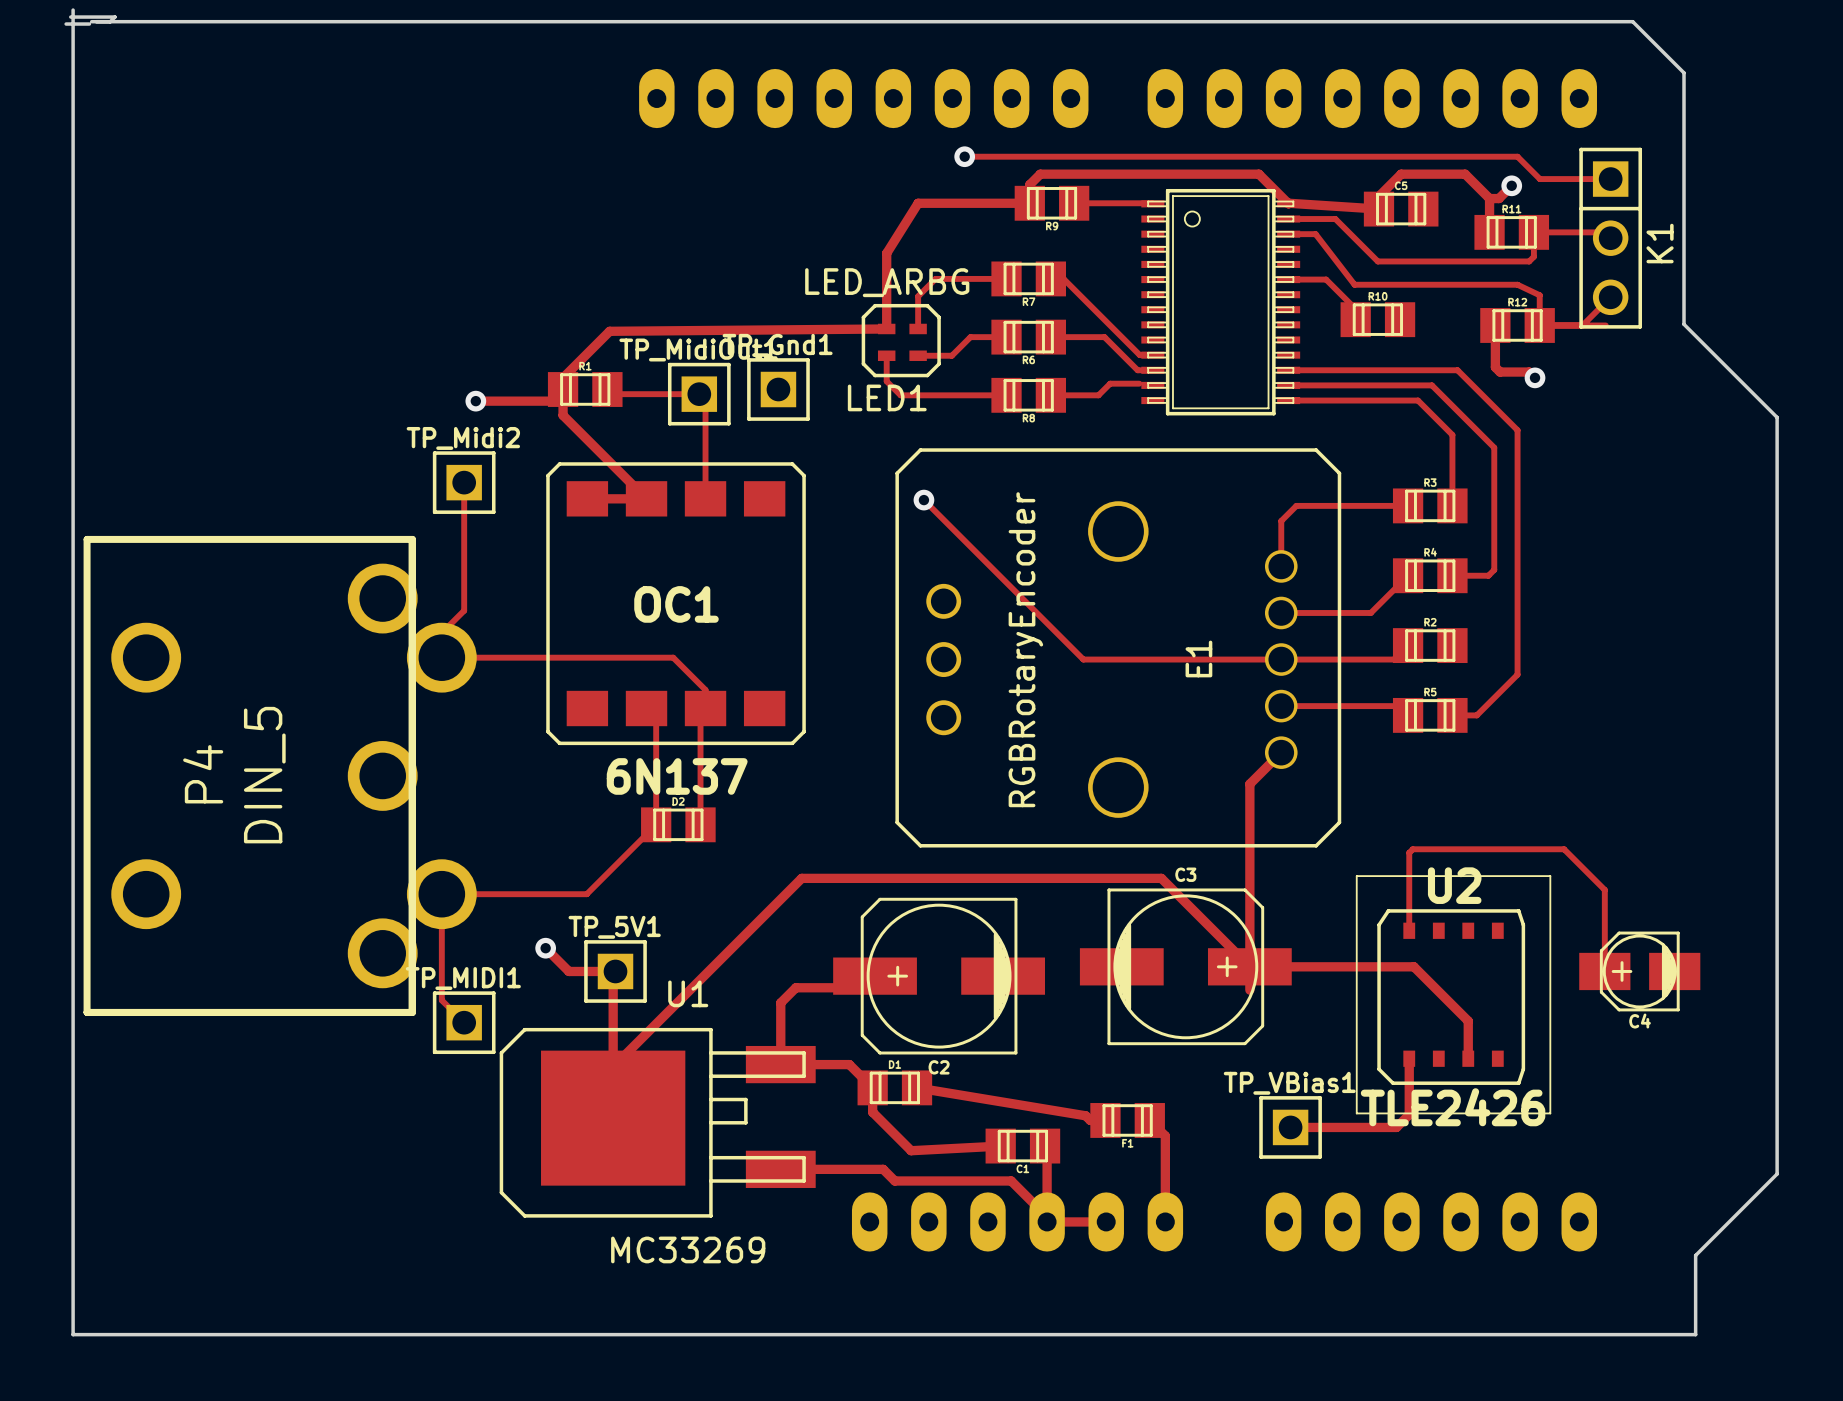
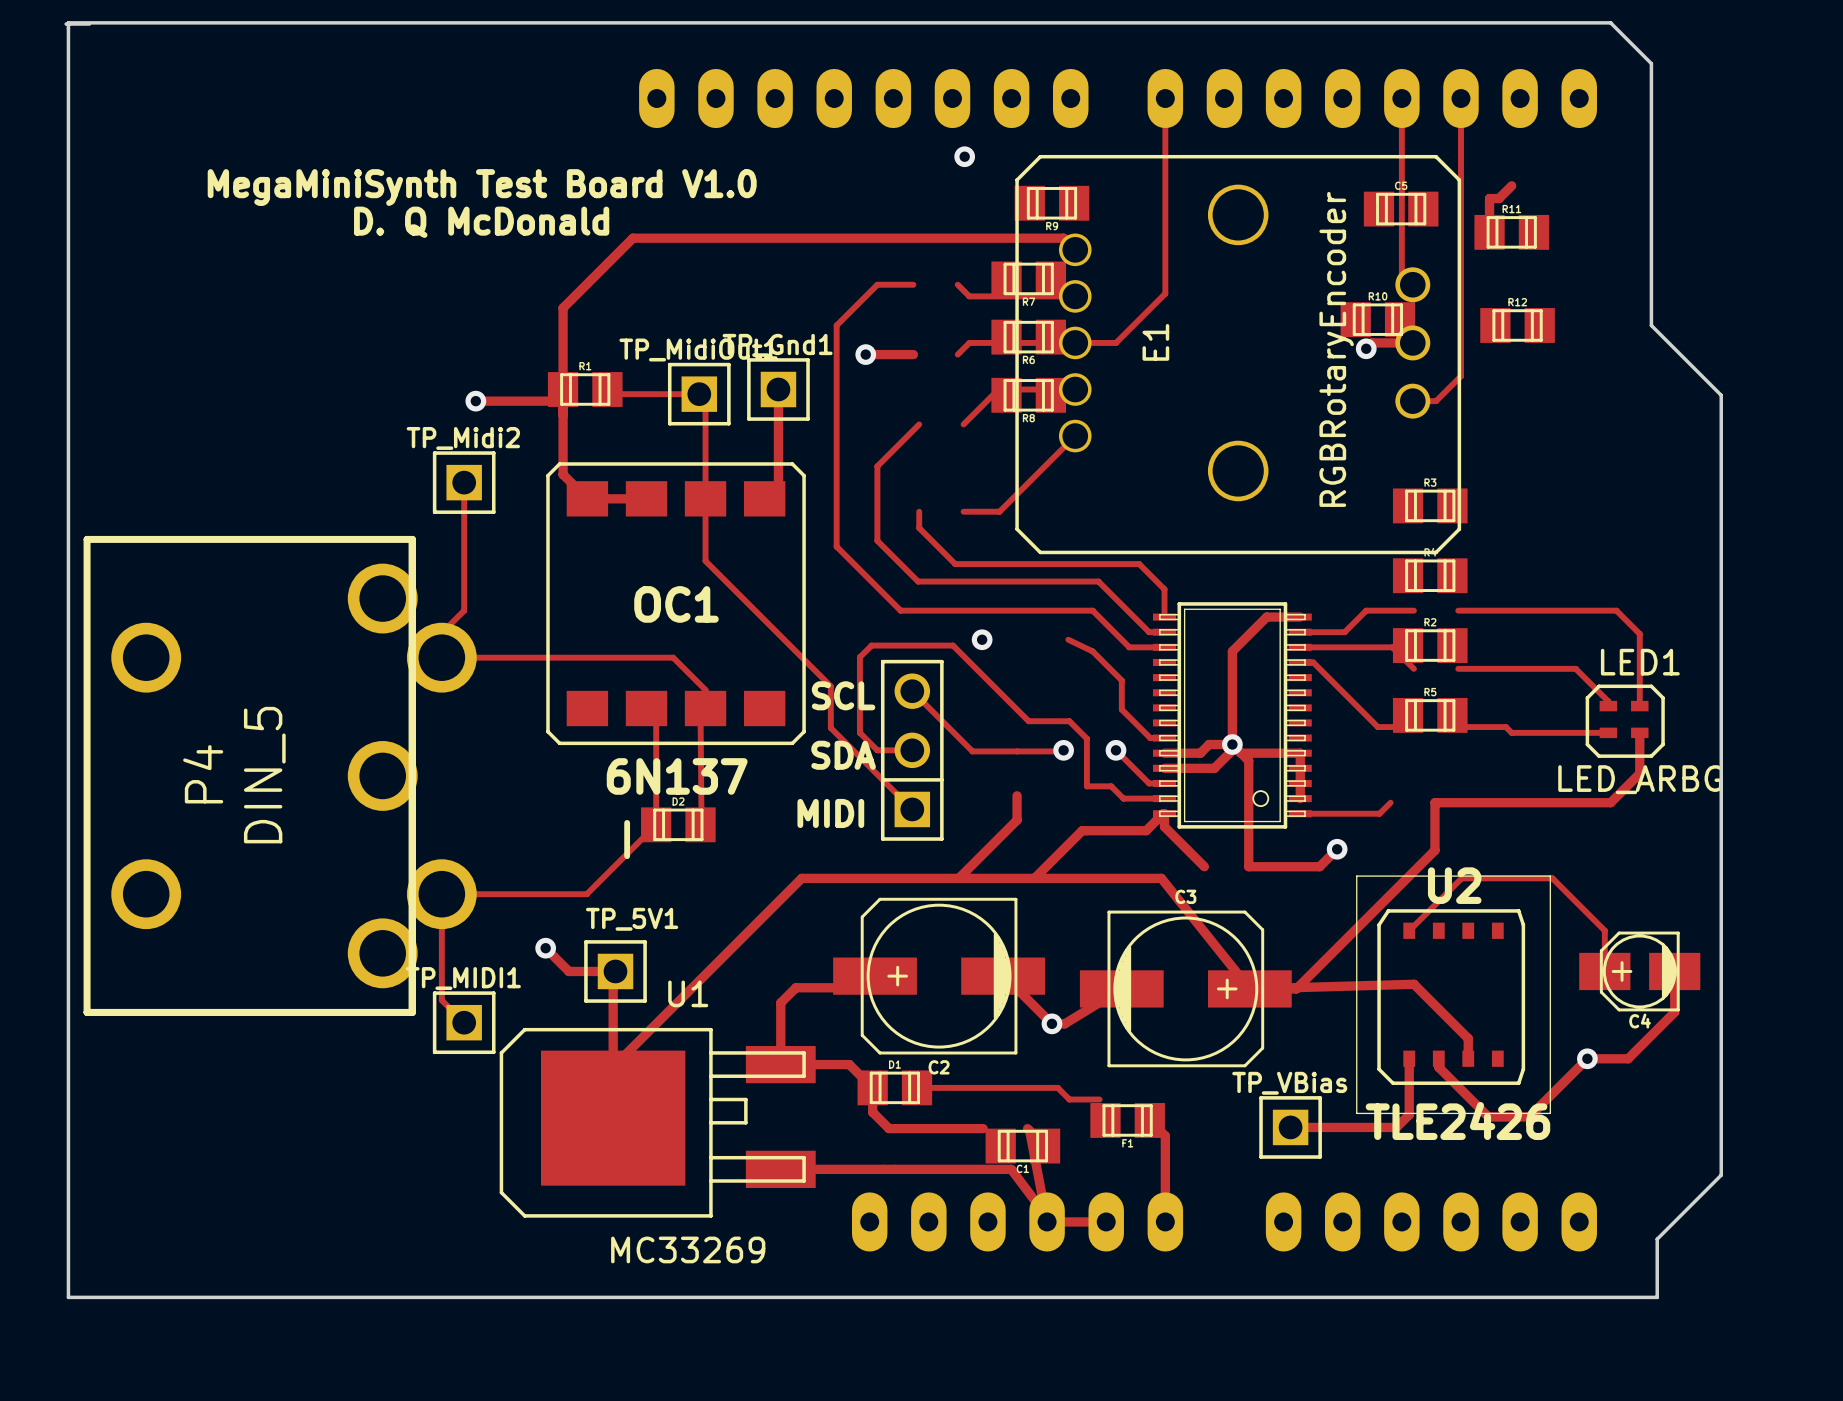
board edge: (73, 10) (73, 1334) (1695, 1334) (1695, 1255) (1777, 1174) (1777, 417) (1684, 324) (1684, 72) (1632, 21) (91, 21) -> none
board edge: (70, 17) (115, 17) (110, 21) -> none
board edge: none -> (68, 22) (68, 1297) (1657, 1297) (1657, 1239) (1721, 1175) (1721, 395) (1651, 325) (1651, 63) (1610, 22) (68, 22)
track: none -> (1165, 98) (1165, 293) (1115, 342) (969, 342) (957, 354)
track: none -> (1460, 98) (1460, 376) (1436, 401) (1412, 401)
track: (964, 156) (1517, 156) (1539, 179) (1610, 179) -> none
via: (1511, 185) -> none
text: none -> MegaMiniSynth Test Board V1.0 (482, 187)
track: (1489, 198) (1465, 174) (1401, 174) (1378, 196) (1378, 209) (1288, 203) (1258, 174) (1040, 174) (1029, 184) (1029, 203) (918, 203) (886, 253) (886, 328) (609, 331) (563, 377) -> (1075, 249) (1063, 238) (632, 238) (563, 308) (563, 377)
track: (1074, 203) (1152, 203) -> none
track: (1288, 219) (1335, 219) (1377, 261) (1529, 261) (1533, 256) (1533, 232) (1604, 232) (1610, 238) (1604, 244) -> none
text: none -> D. Q McDonald (481, 222)
track: (1288, 234) (1315, 234) (1354, 284) (1406, 284) -> (1401, 98) (1401, 279) (1406, 284)
K1: (1610, 238) -> none
track: (1006, 278) (935, 278) (918, 296) (918, 328) -> none
track: (1050, 278) (1063, 278) (1139, 355) (1152, 355) -> none
track: (1288, 279) (1326, 279) (1355, 309) (1355, 319) -> none
track: none -> (913, 284) (877, 284) (836, 325) (836, 546) (900, 610) (1092, 610) (1129, 647) (1164, 647)
track: none -> (957, 284) (969, 296) (1075, 296)
track: (1412, 284) (1517, 284) (1539, 295) (1539, 325) (1605, 325) -> none
track: (1610, 297) (1582, 325) -> none
part rotation: 0° (1220, 302) -> 180° (1232, 715)
part position: (1220, 302) -> (1232, 715)
track: (1495, 325) (1495, 367) (1500, 372) (1529, 372) (1535, 377) -> none
track: (1006, 337) (970, 337) (951, 355) (918, 355) -> none
track: (1050, 337) (1104, 337) (1137, 370) (1152, 370) -> none
LED1 rotation: 0° (901, 340) -> 180° (1625, 721)
LED1 position: (901, 340) -> (1625, 721)
track: none -> (1412, 342) (1372, 342) (1366, 348)
via: none -> (1366, 348)
track: none -> (865, 354) (913, 354)
via: none -> (865, 354)
track: (886, 355) (886, 381) (900, 395) (1006, 395) -> none
track: (1288, 370) (1457, 370) (1517, 430) (1517, 674) (1476, 715) (1452, 715) -> none
via: (1535, 377) -> none
track: (1139, 383) (1110, 383) (1098, 395) (1050, 395) -> none
track: (1288, 385) (1431, 385) (1494, 447) (1494, 569) (1488, 575) (1452, 575) -> none
track: none -> (778, 389) (778, 485) (764, 498)
track: none -> (1075, 389) (998, 389) (963, 424)
track: (1288, 400) (1418, 400) (1452, 434) (1452, 505) -> none
track: (563, 415) (646, 498) -> (563, 415) (563, 474) (587, 498)
track: none -> (919, 424) (877, 466) (877, 540) (918, 581) (1098, 581) (1149, 632) (1164, 632)
track: none -> (1075, 436) (999, 511) (963, 511)
track: none -> (705, 498) (705, 561) (830, 686) (830, 727) (912, 809)
track: (923, 500) (1083, 659) (1394, 659) (1408, 645) -> none
via: (923, 500) -> none
track: (1408, 505) (1296, 505) (1281, 521) (1281, 566) -> none
track: none -> (919, 511) (919, 528) (955, 564) (1139, 564) (1164, 589) (1164, 617)
track: (1408, 575) (1370, 612) (1281, 612) -> none
track: none -> (1413, 610) (1366, 610) (1344, 632) (1300, 632)
track: none -> (1458, 610) (1616, 610) (1639, 633) (1639, 706)
track: none -> (1300, 617) (1266, 617) (1232, 651) (1232, 750) (1214, 768) (1164, 768)
via: none -> (982, 639)
track: none -> (1068, 639) (1092, 651) (1121, 680) (1121, 709) (1150, 738) (1164, 738)
E1 rotation: 0° (1118, 647) -> 180° (1238, 354)
E1 position: (1118, 647) -> (1238, 354)
track: none -> (1300, 647) (1392, 647) (1413, 668)
track: none -> (1300, 662) (1313, 662) (1377, 727) (1413, 727)
track: none -> (1458, 668) (1575, 668) (1608, 701) (1608, 706)
track: none -> (912, 691) (972, 751) (1063, 750)
text: none -> SCL (843, 695)
track: (1281, 706) (1398, 706) (1408, 715) -> none
track: (700, 713) (700, 824) -> (700, 713) (701, 837)
track: none -> (1458, 727) (1505, 727) (1511, 732) (1608, 732)
track: none -> (1639, 732) (1639, 773) (1610, 802) (1434, 802) (1434, 850) (1296, 988) (1249, 988)
via: none -> (1232, 744)
track: none -> (912, 750) (877, 750) (859, 732) (859, 657) (871, 645) (953, 645) (1028, 721) (1069, 721) (1086, 738) (1086, 786) (1111, 786) (1123, 798) (1164, 798)
part: none -> (912, 750)
via: none -> (1063, 750)
track: none -> (1115, 750) (1149, 783) (1164, 783)
via: none -> (1115, 750)
track: (1281, 752) (1249, 784) (1249, 990) -> none
track: none -> (1164, 753) (1200, 753) (1209, 744) (1232, 744) (1248, 760) (1248, 866) (1319, 866) (1337, 849)
track: none -> (1241, 753) (1300, 753) (1300, 798)
text: none -> SDA (843, 755)
track: none -> (1017, 795) (1017, 820) (958, 878)
track: none -> (1390, 802) (1379, 813) (1300, 813)
text: none -> MIDI (830, 813)
text: none -> | (627, 839)
via: none -> (1337, 849)
track: none -> (1204, 866) (1164, 826) (1163, 813) (1146, 830) (1082, 830) (1034, 878)
track: (1161, 878) (1249, 966) (1413, 966) (1468, 1021) (1468, 1038) -> (1249, 988) (1413, 984) (1468, 1038)
track: none -> (1161, 878) (1249, 988)
TP_5V1 name position: TP_5V1 (614, 927) -> TP_5V1 (632, 919)
track: (1409, 930) (1409, 852) (1412, 849) (1564, 849) (1604, 889) (1604, 930) -> (1409, 930) (1461, 878) (1552, 878) (1604, 930)
C3 position: (1185, 966) -> (1185, 988)
track: none -> (1674, 971) (1674, 1012) (1628, 1058) (1587, 1058) (1529, 1116) (1488, 1116) (1438, 1067) (1438, 1058)
track: none -> (1003, 976) (1051, 1023) (1064, 1023) (1121, 988)
via: none -> (1051, 1023)
via: none -> (1587, 1058)
TP_VBias1 name: TP_VBias1 (1289, 1083) -> TP_VBias (1289, 1083)
track: (917, 1087) (1085, 1115) (1090, 1120) (1105, 1120) -> (917, 1087) (1057, 1087) (1069, 1099) (1099, 1099)
U2 value position: TLE2426 (1453, 1107) -> TLE2426 (1457, 1120)
track: (889, 1128) (911, 1150) (1000, 1146) -> (889, 1128) (983, 1128)
track: none -> (1027, 1128) (1029, 1130) (1047, 1221)
track: (1045, 1146) (1047, 1148) (1047, 1216) (1011, 1180) (894, 1180) (883, 1169) -> (1047, 1216) (1011, 1169) (883, 1169)

